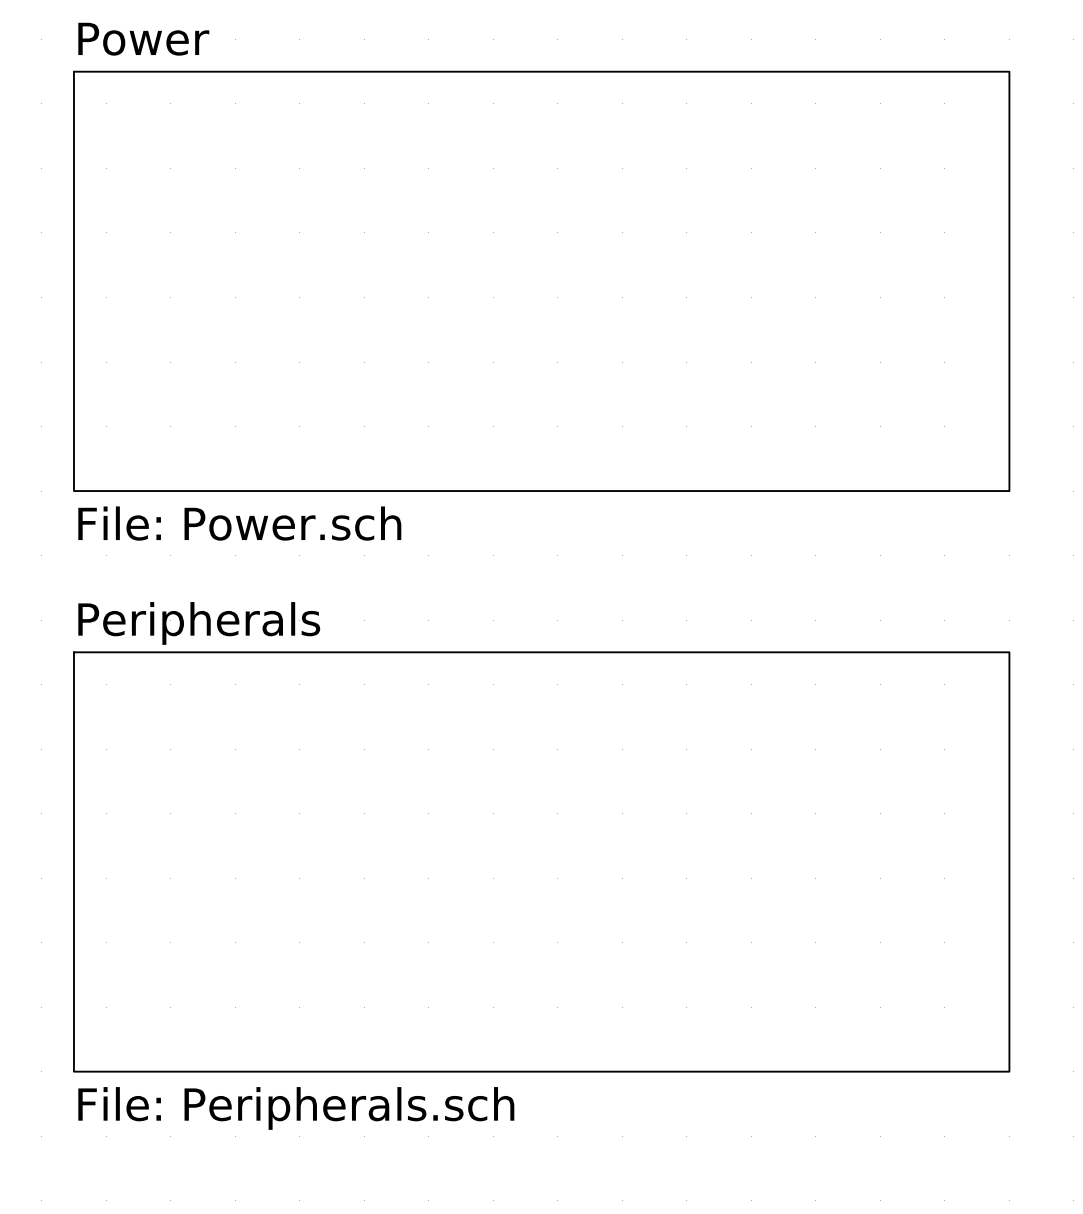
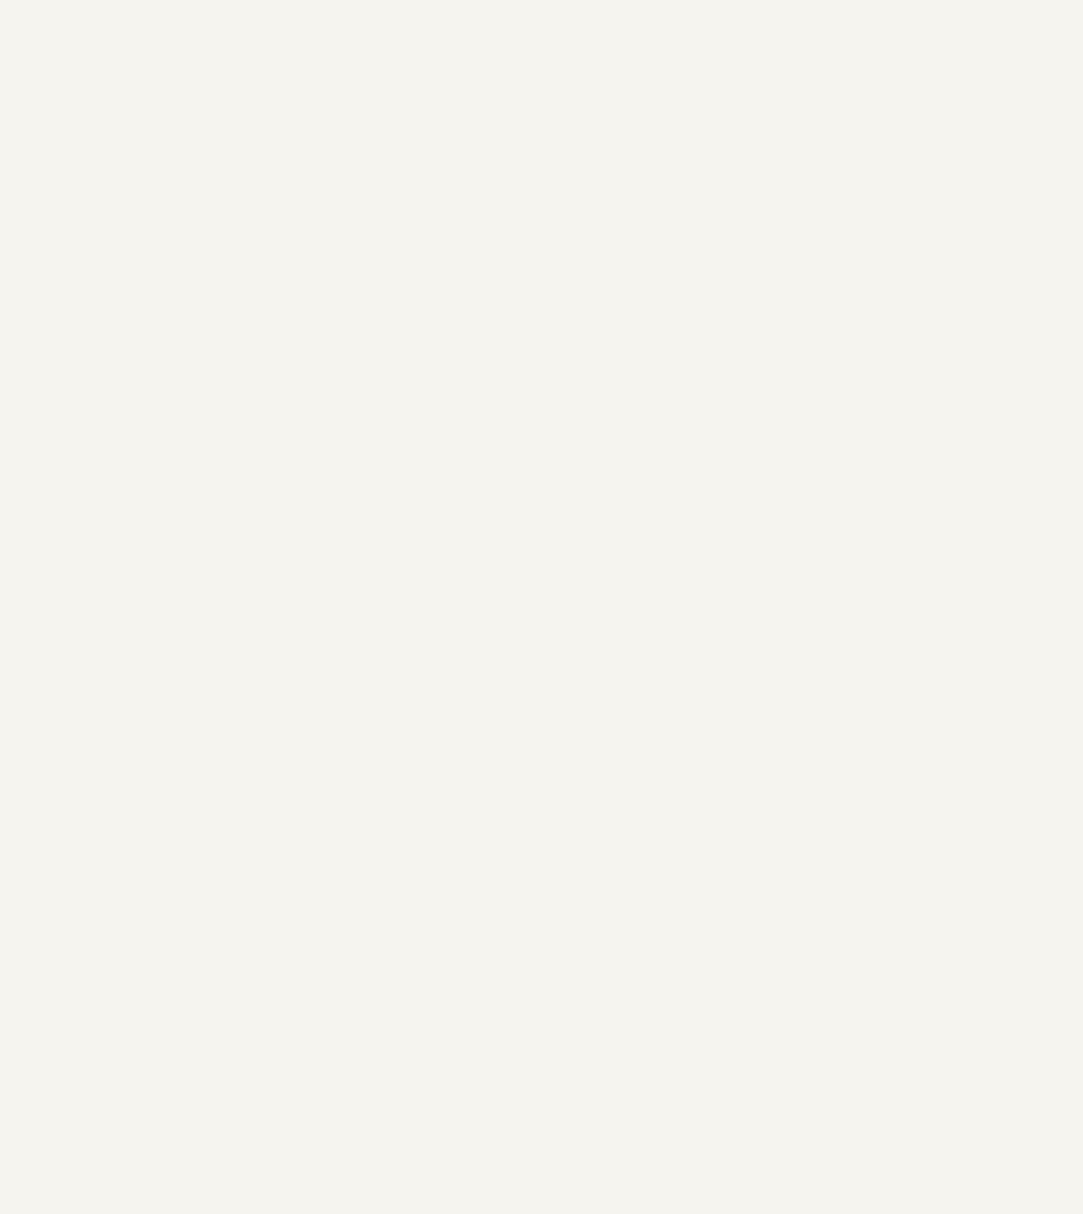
sheet Power: File: Power.sch (541, 281) -> none
sheet Peripherals: File: Peripherals.sch (541, 861) -> none

